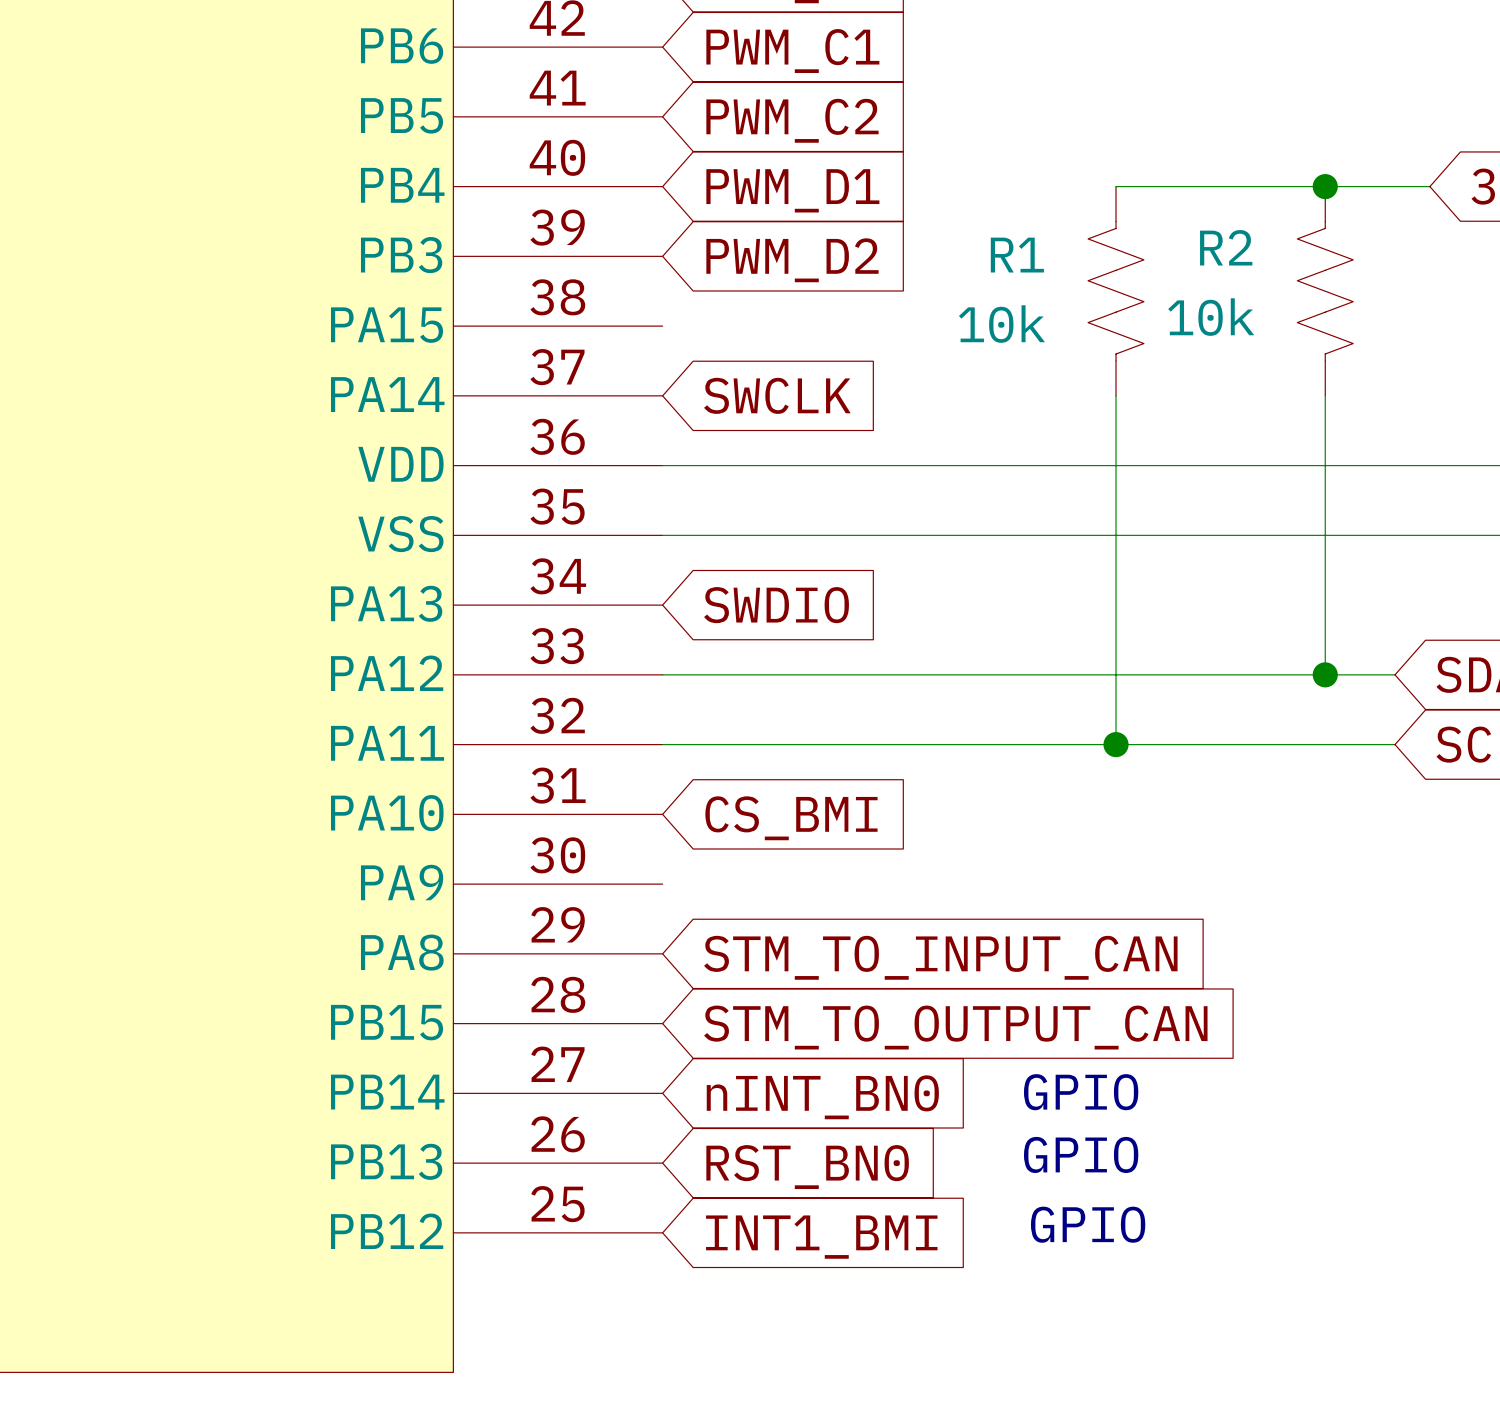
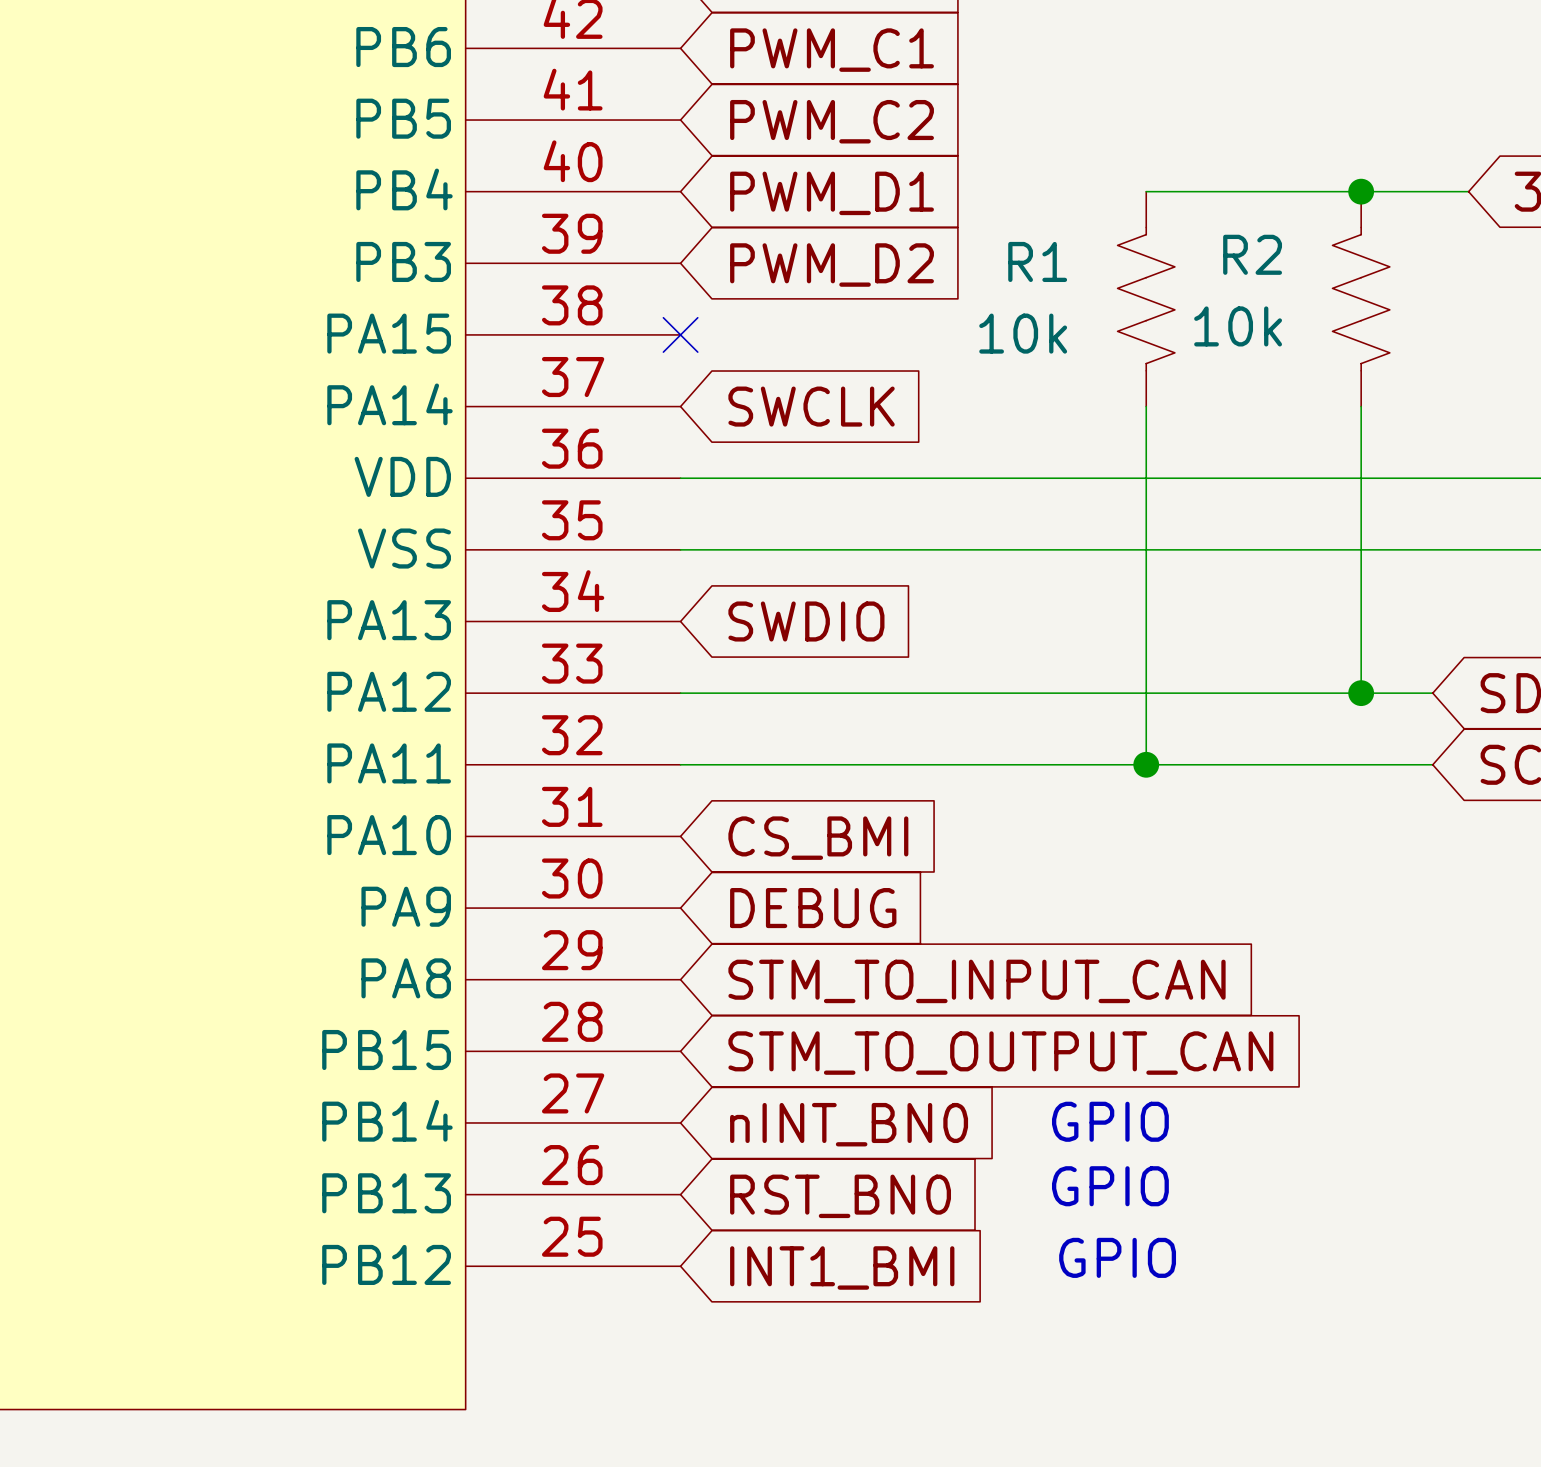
no-connect mark: none -> (680, 334)
global label: none -> DEBUG (813, 908)

